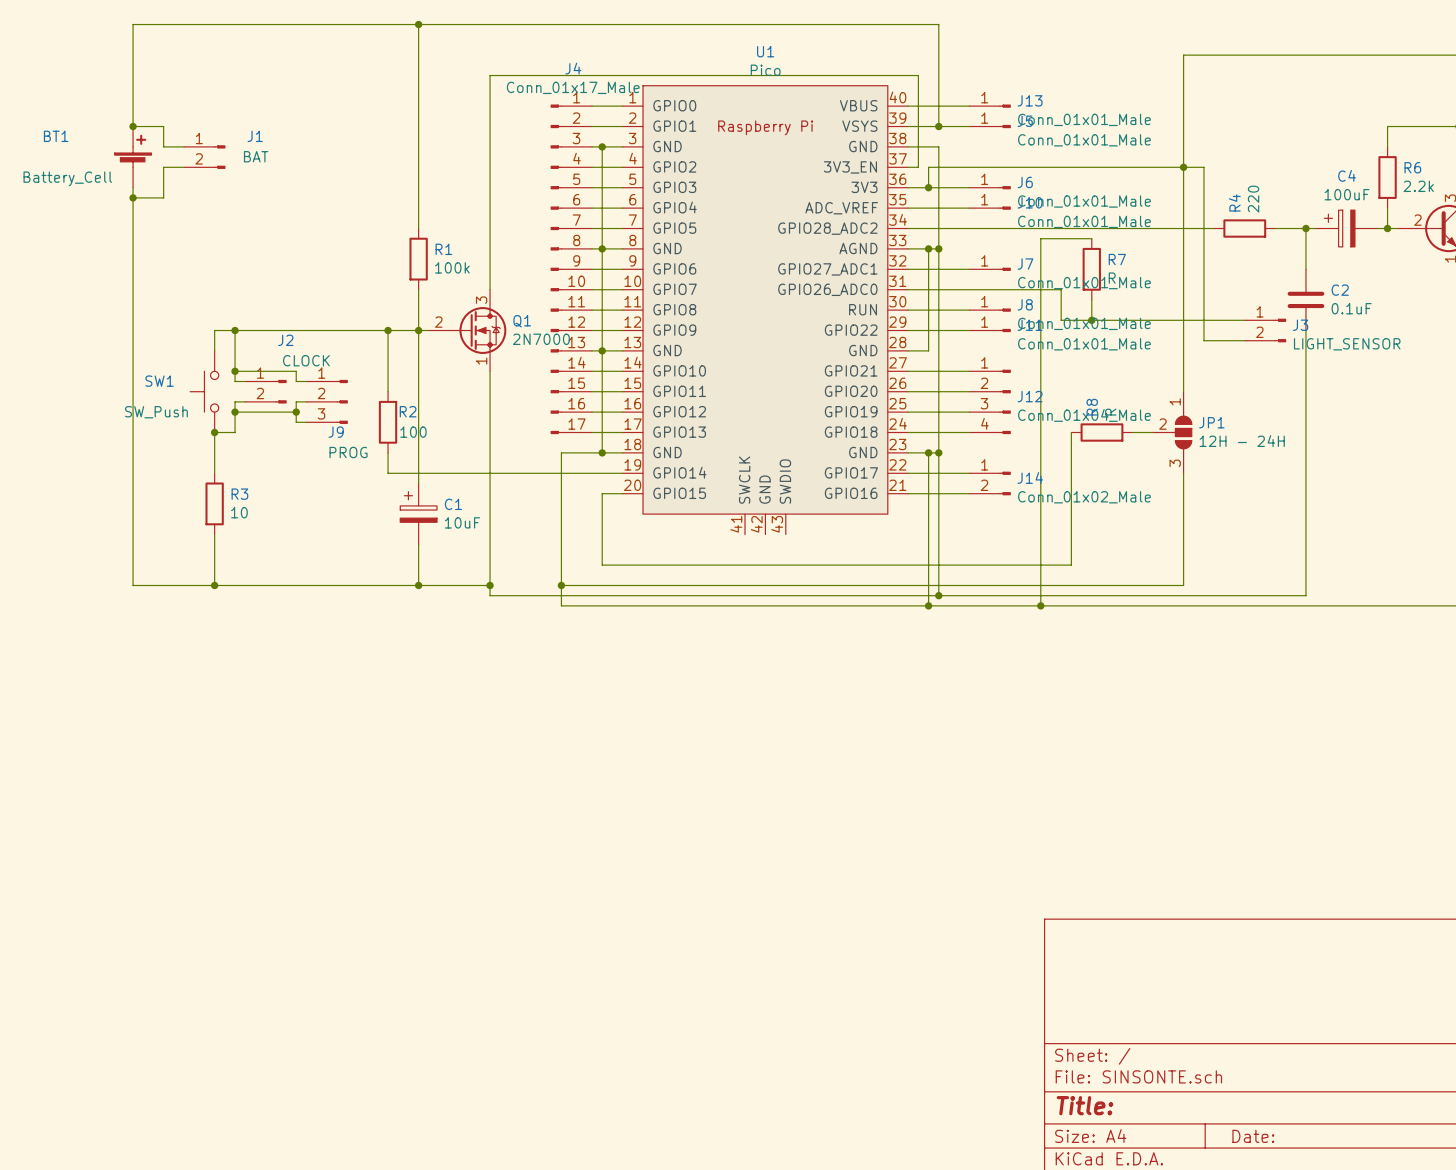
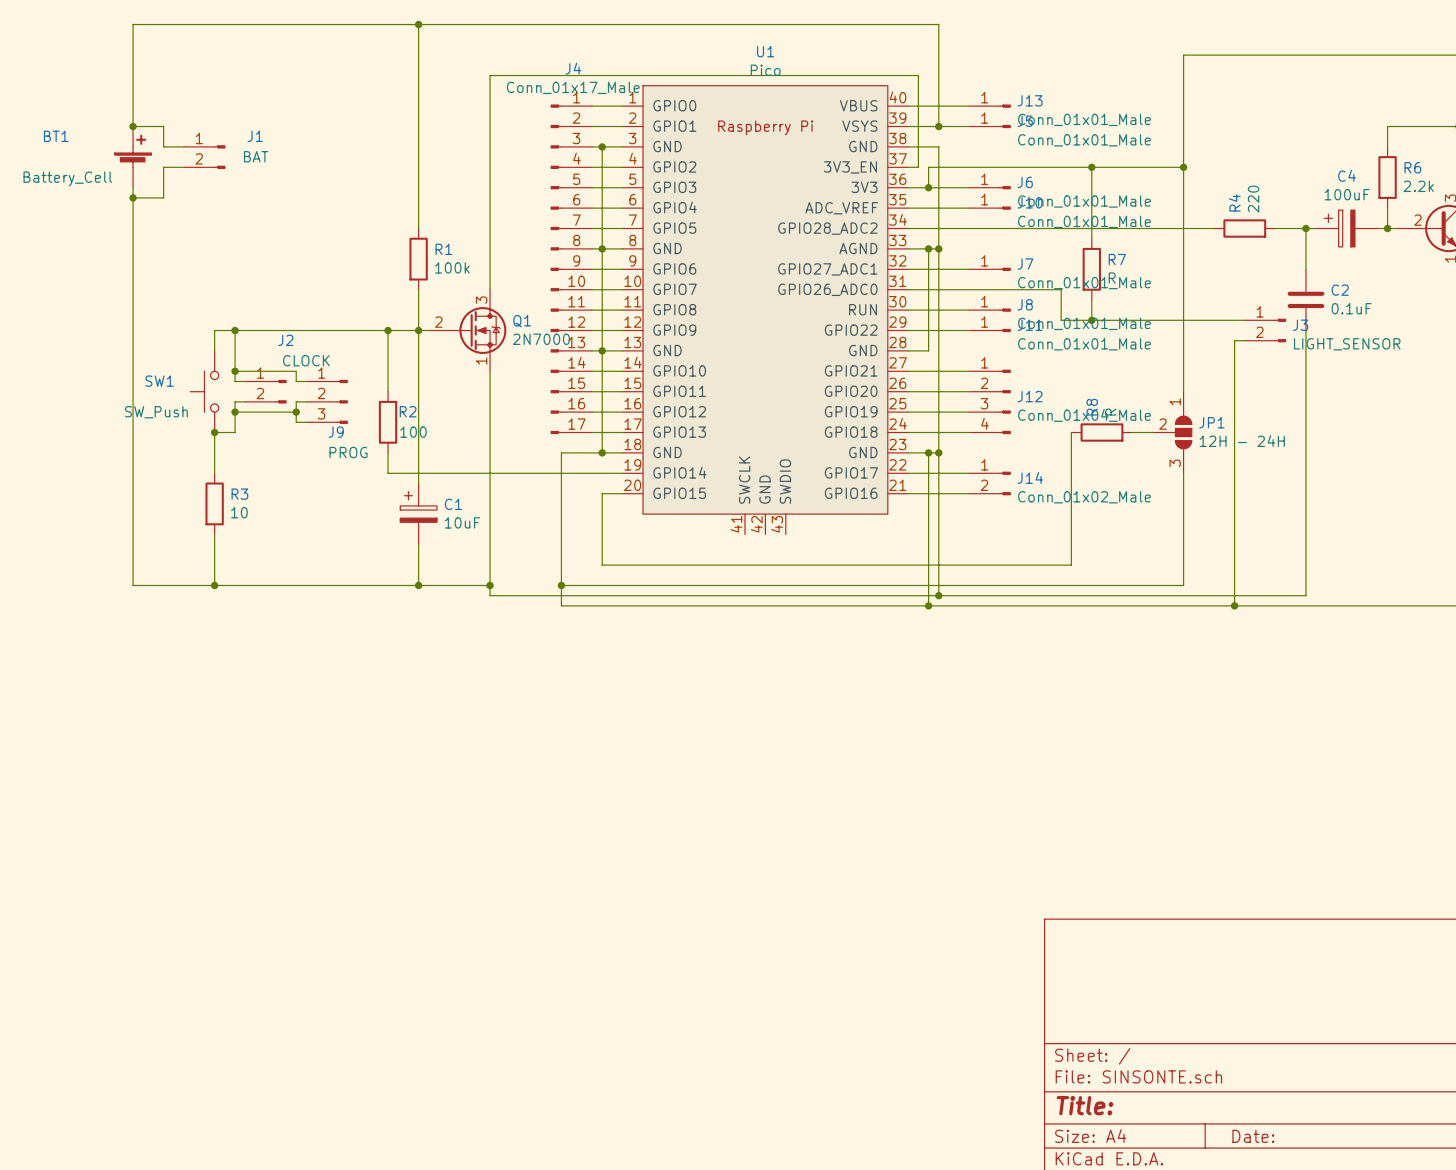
junction: none -> (1091, 167)
wire: (1183, 167) (1203, 167) (1203, 340) (1234, 340) -> (1234, 605) (1234, 340)
wire: (1091, 238) (1040, 238) (1040, 605) -> (1091, 238) (1091, 167)
junction: (1040, 605) -> none
junction: none -> (1234, 605)

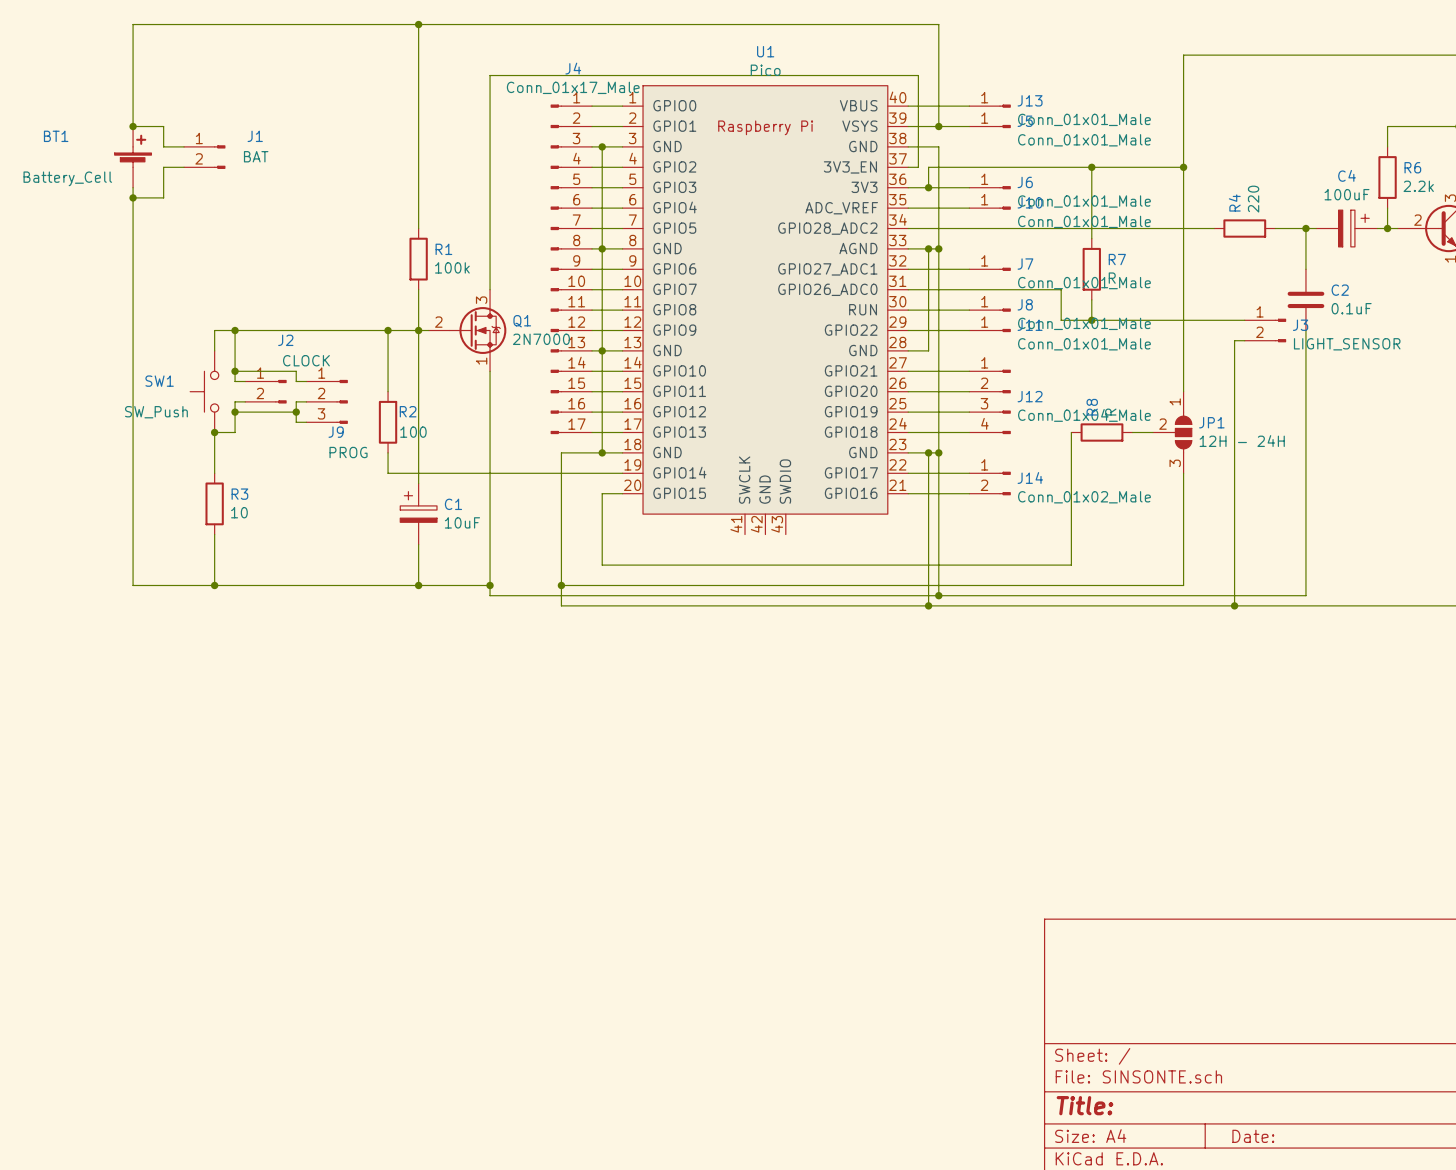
C4 flip: as is (1339, 228) -> left-right (1353, 228)

